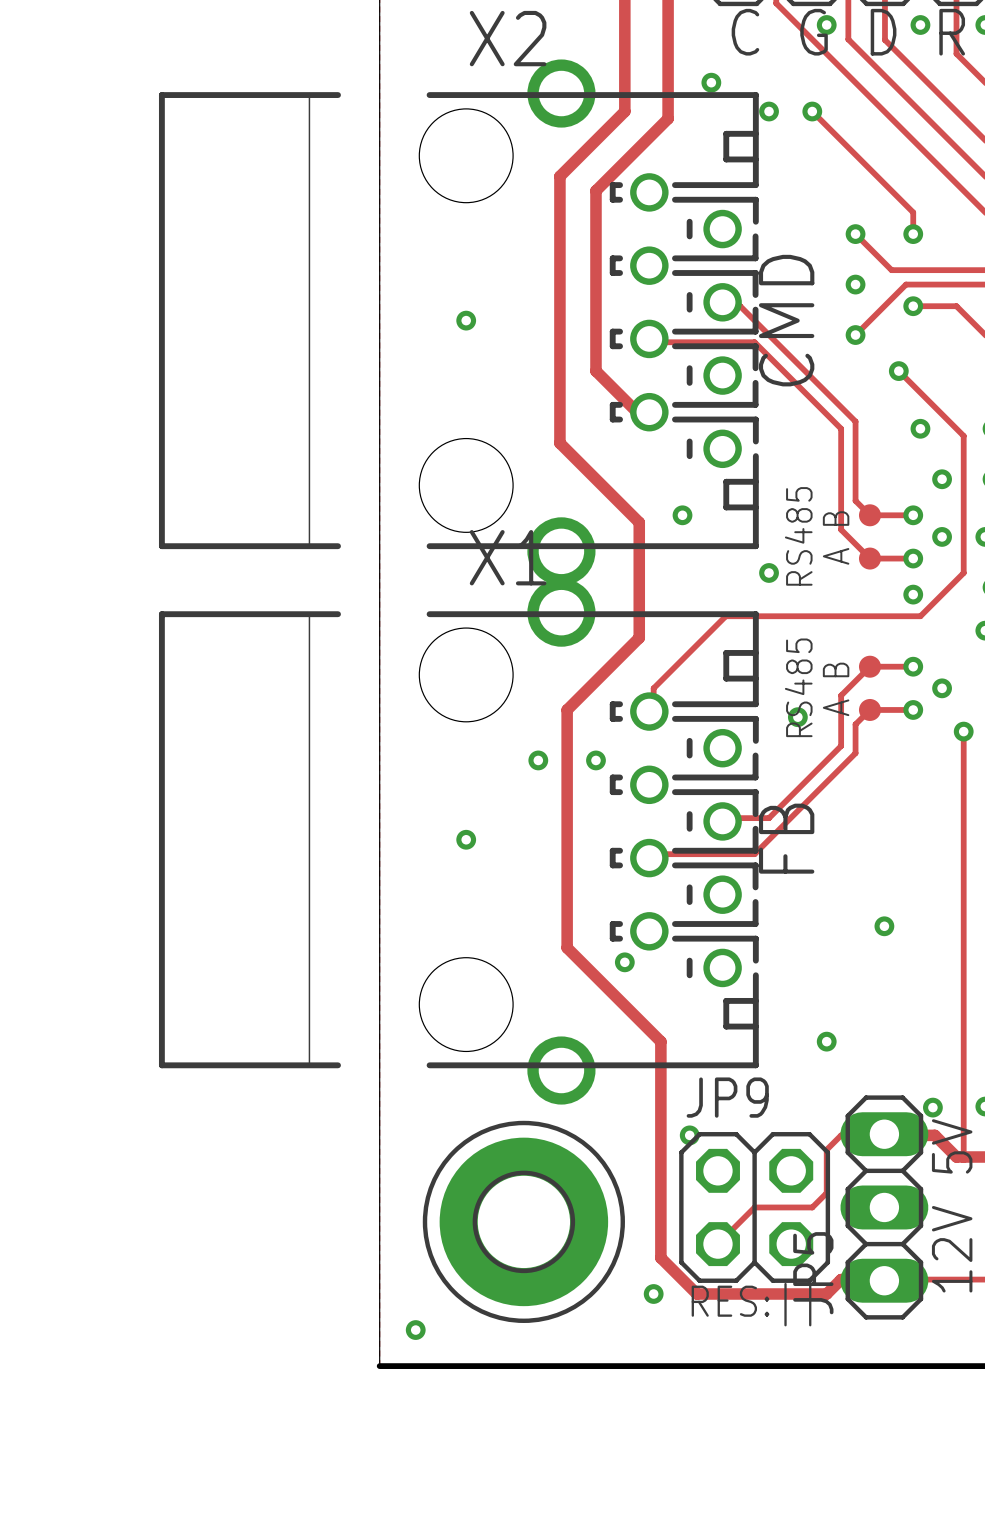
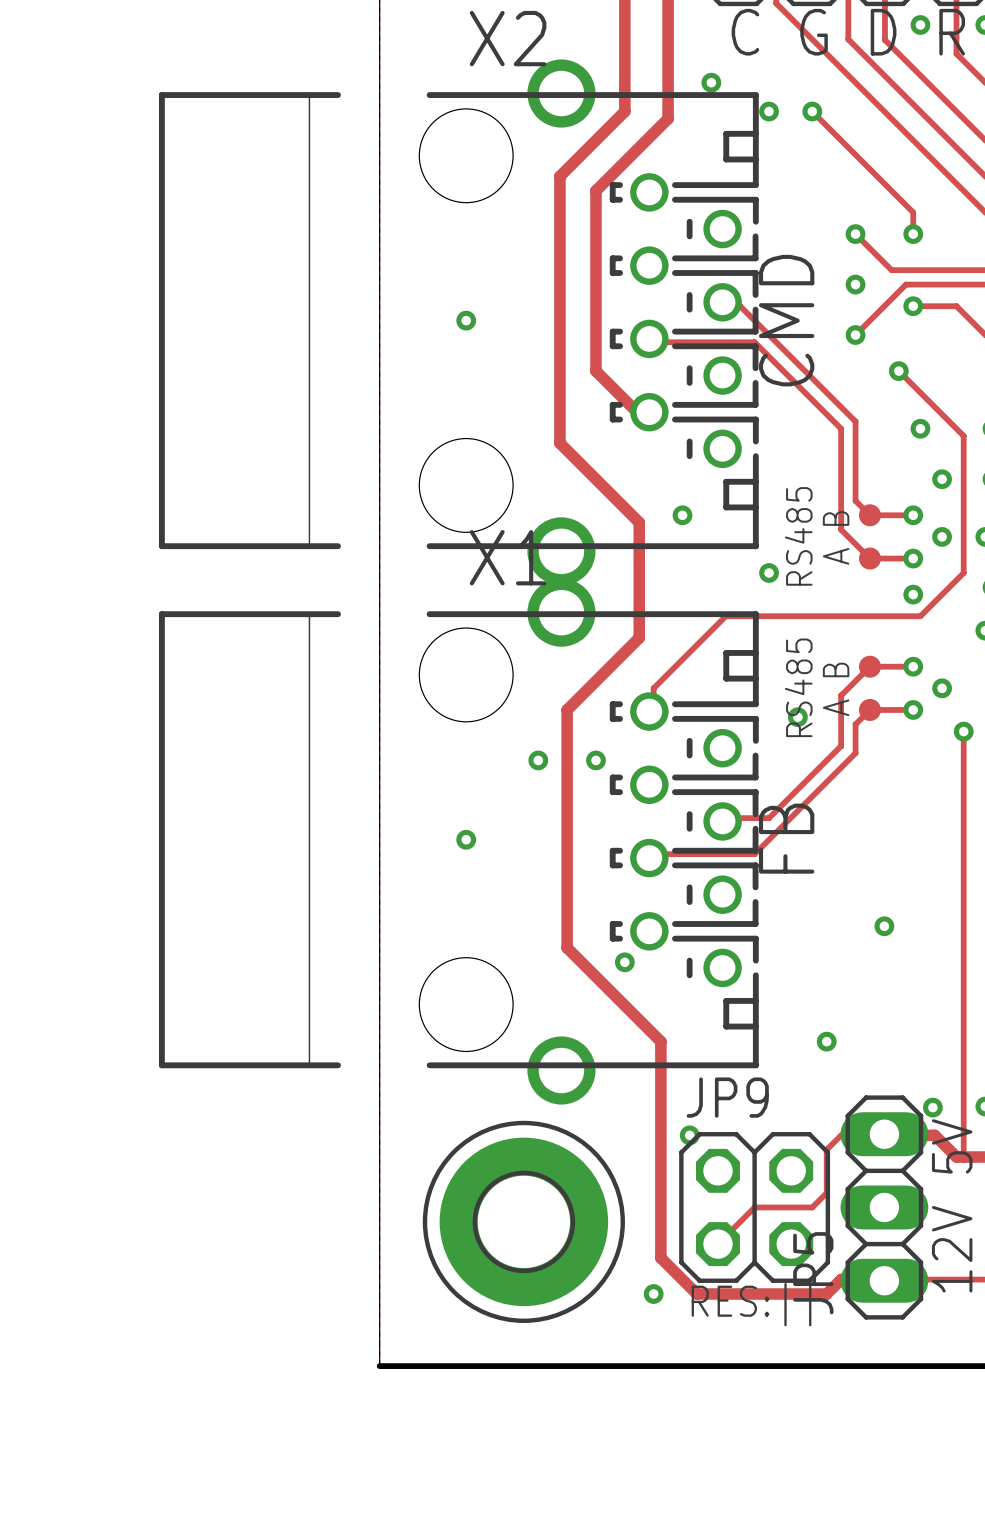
via: (826, 25) -> none
via: (415, 1330) -> none

